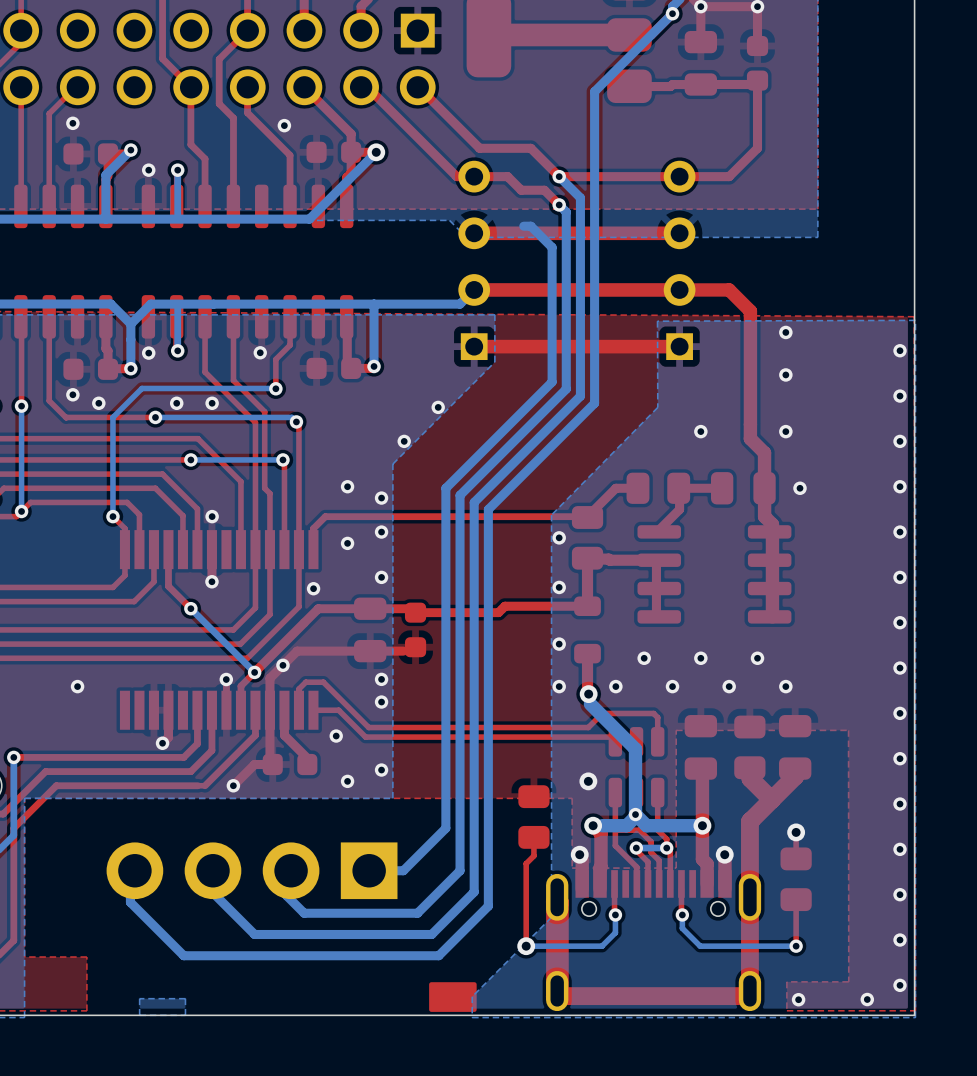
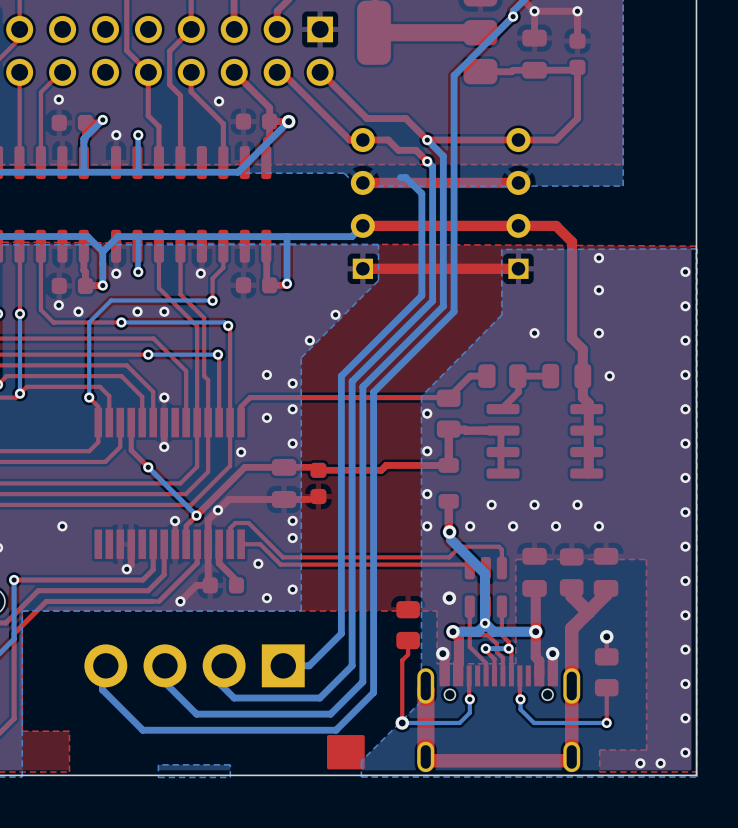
drawing shape: [429, 982, 477, 1012] -> [327, 735, 365, 770]
bottom zone outline: (185, 998) (185, 1015) (139, 1015) (139, 998) (185, 998) -> none
via position: (798, 999) -> (640, 763)
bottom zone outline: none -> (230, 764) (230, 777) (158, 777) (158, 764) (230, 764)

